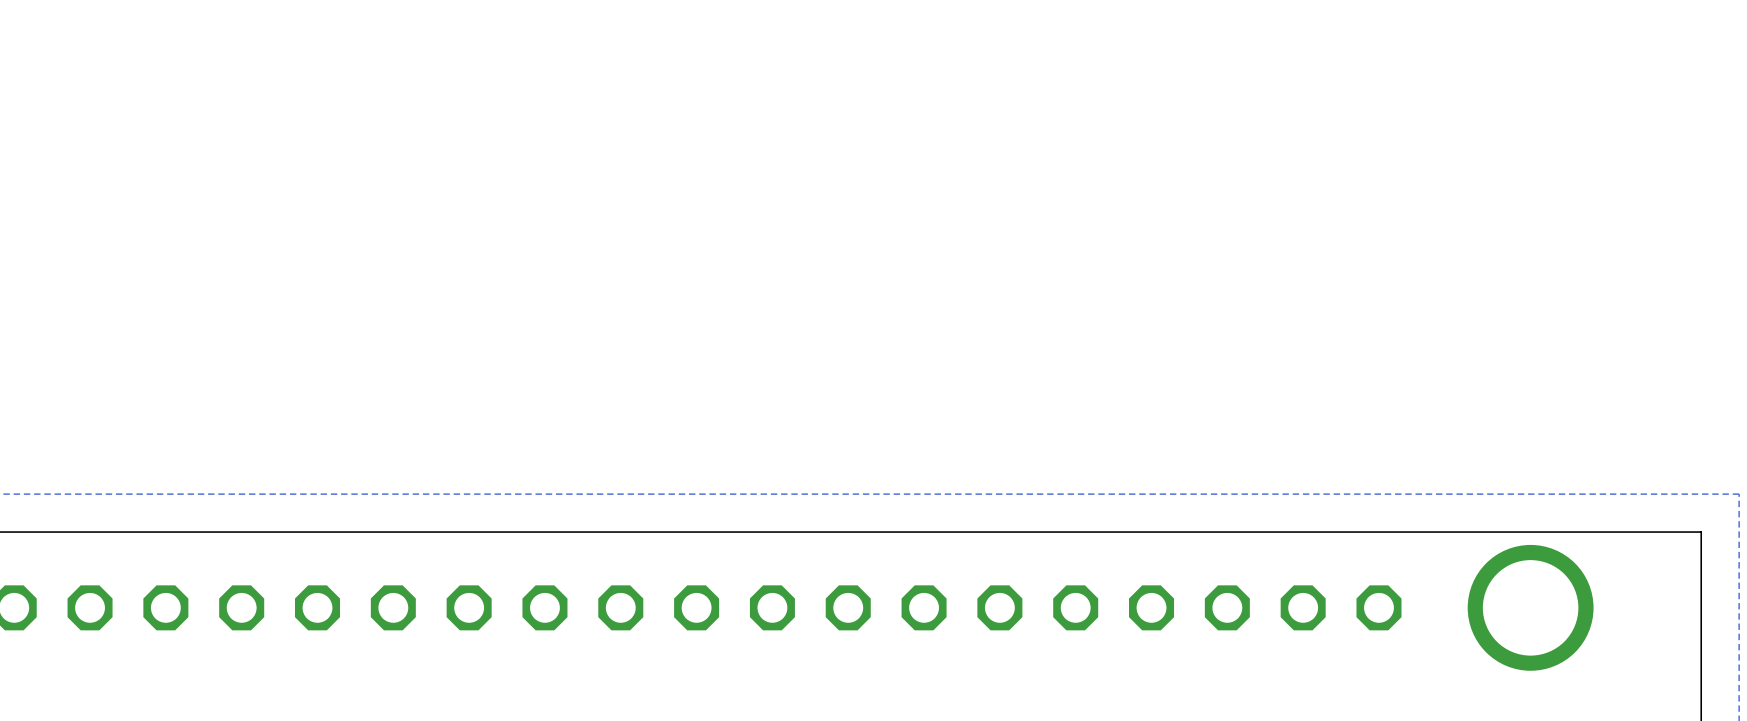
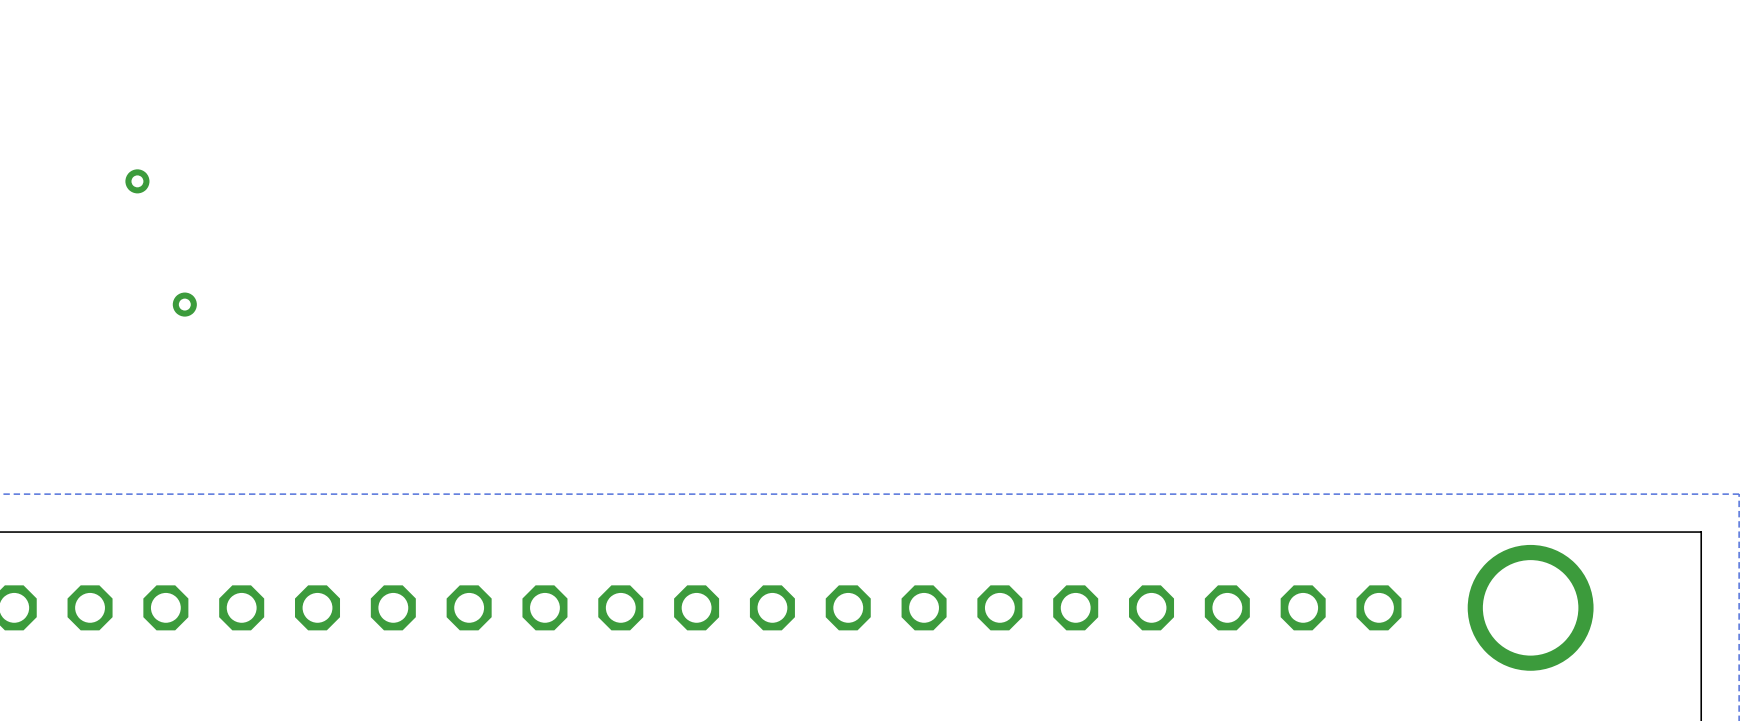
via: none -> (137, 181)
via: none -> (184, 304)

